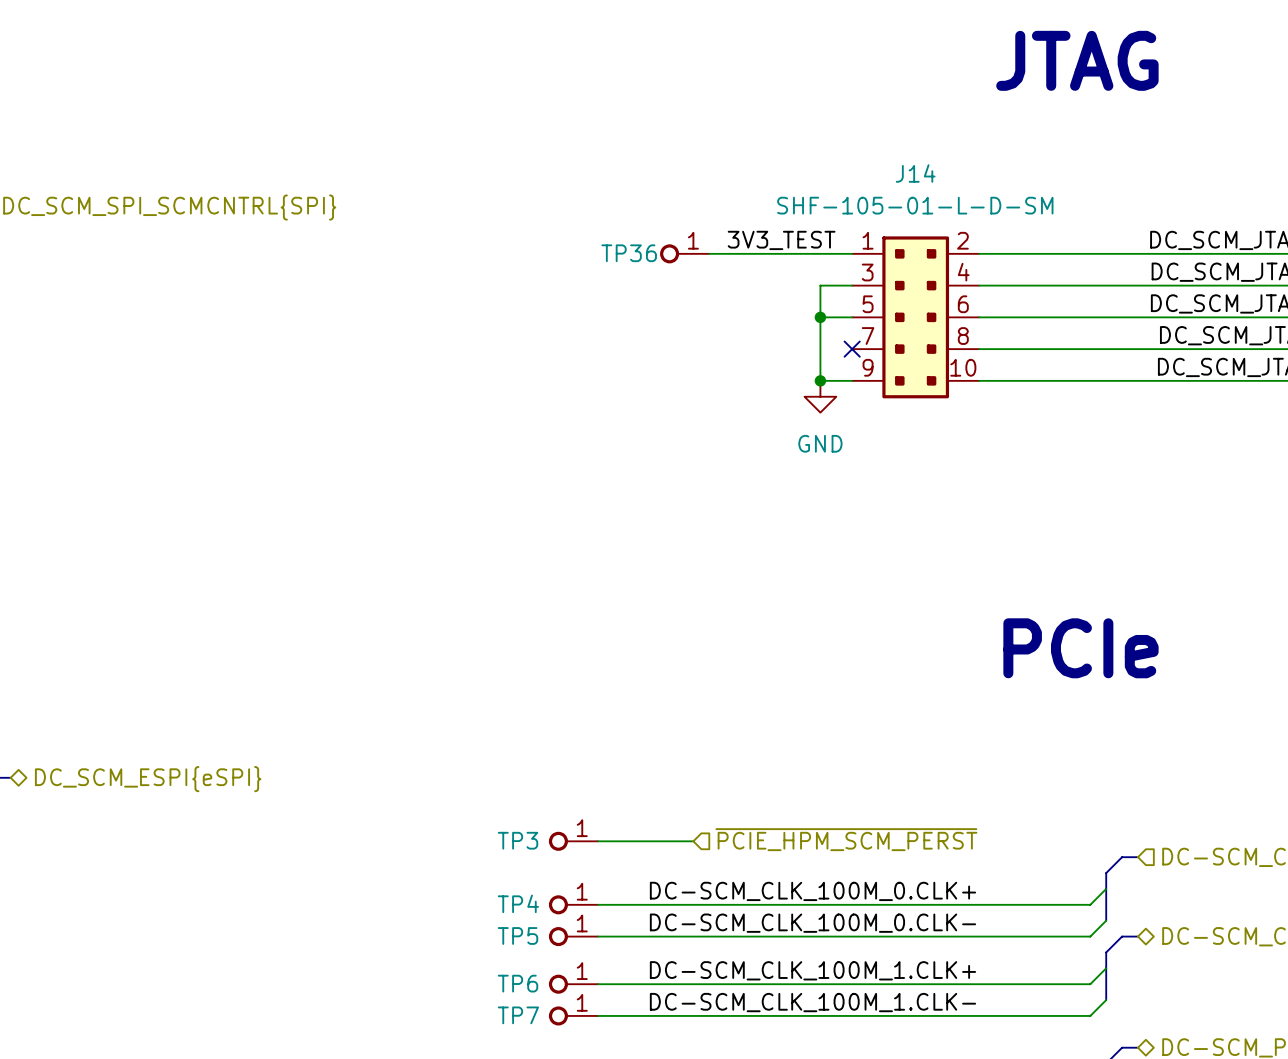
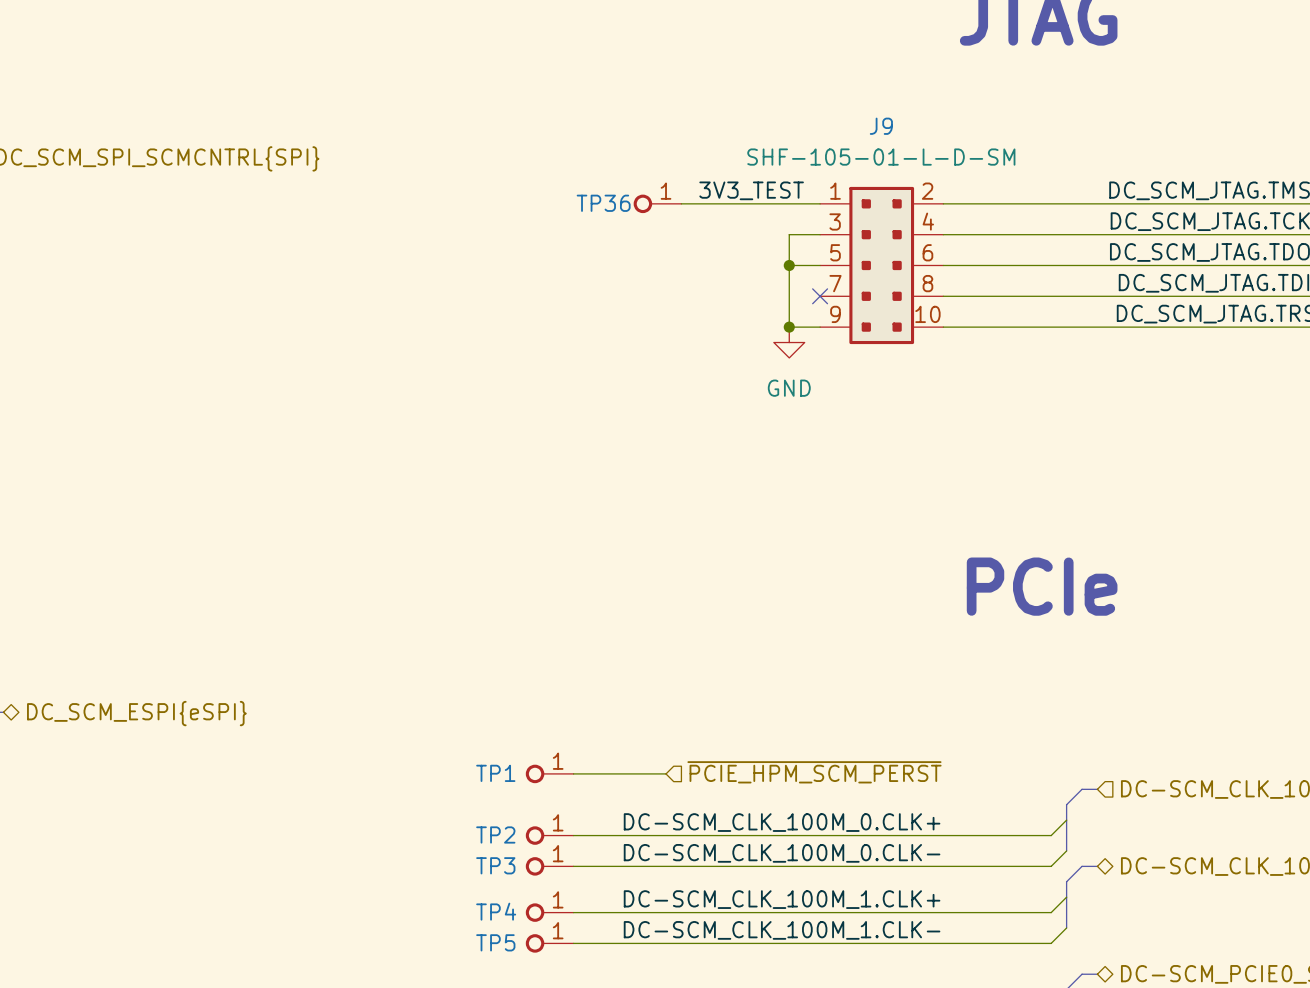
J14 name: J14 (915, 173) -> J9 (881, 126)
TP3 name: TP3 (517, 840) -> TP1 (495, 773)
TP4 name: TP4 (518, 903) -> TP2 (495, 834)
TP5 name: TP5 (517, 935) -> TP3 (495, 865)
TP6 name: TP6 (517, 983) -> TP4 (496, 911)
TP7 name: TP7 (518, 1015) -> TP5 (495, 942)

